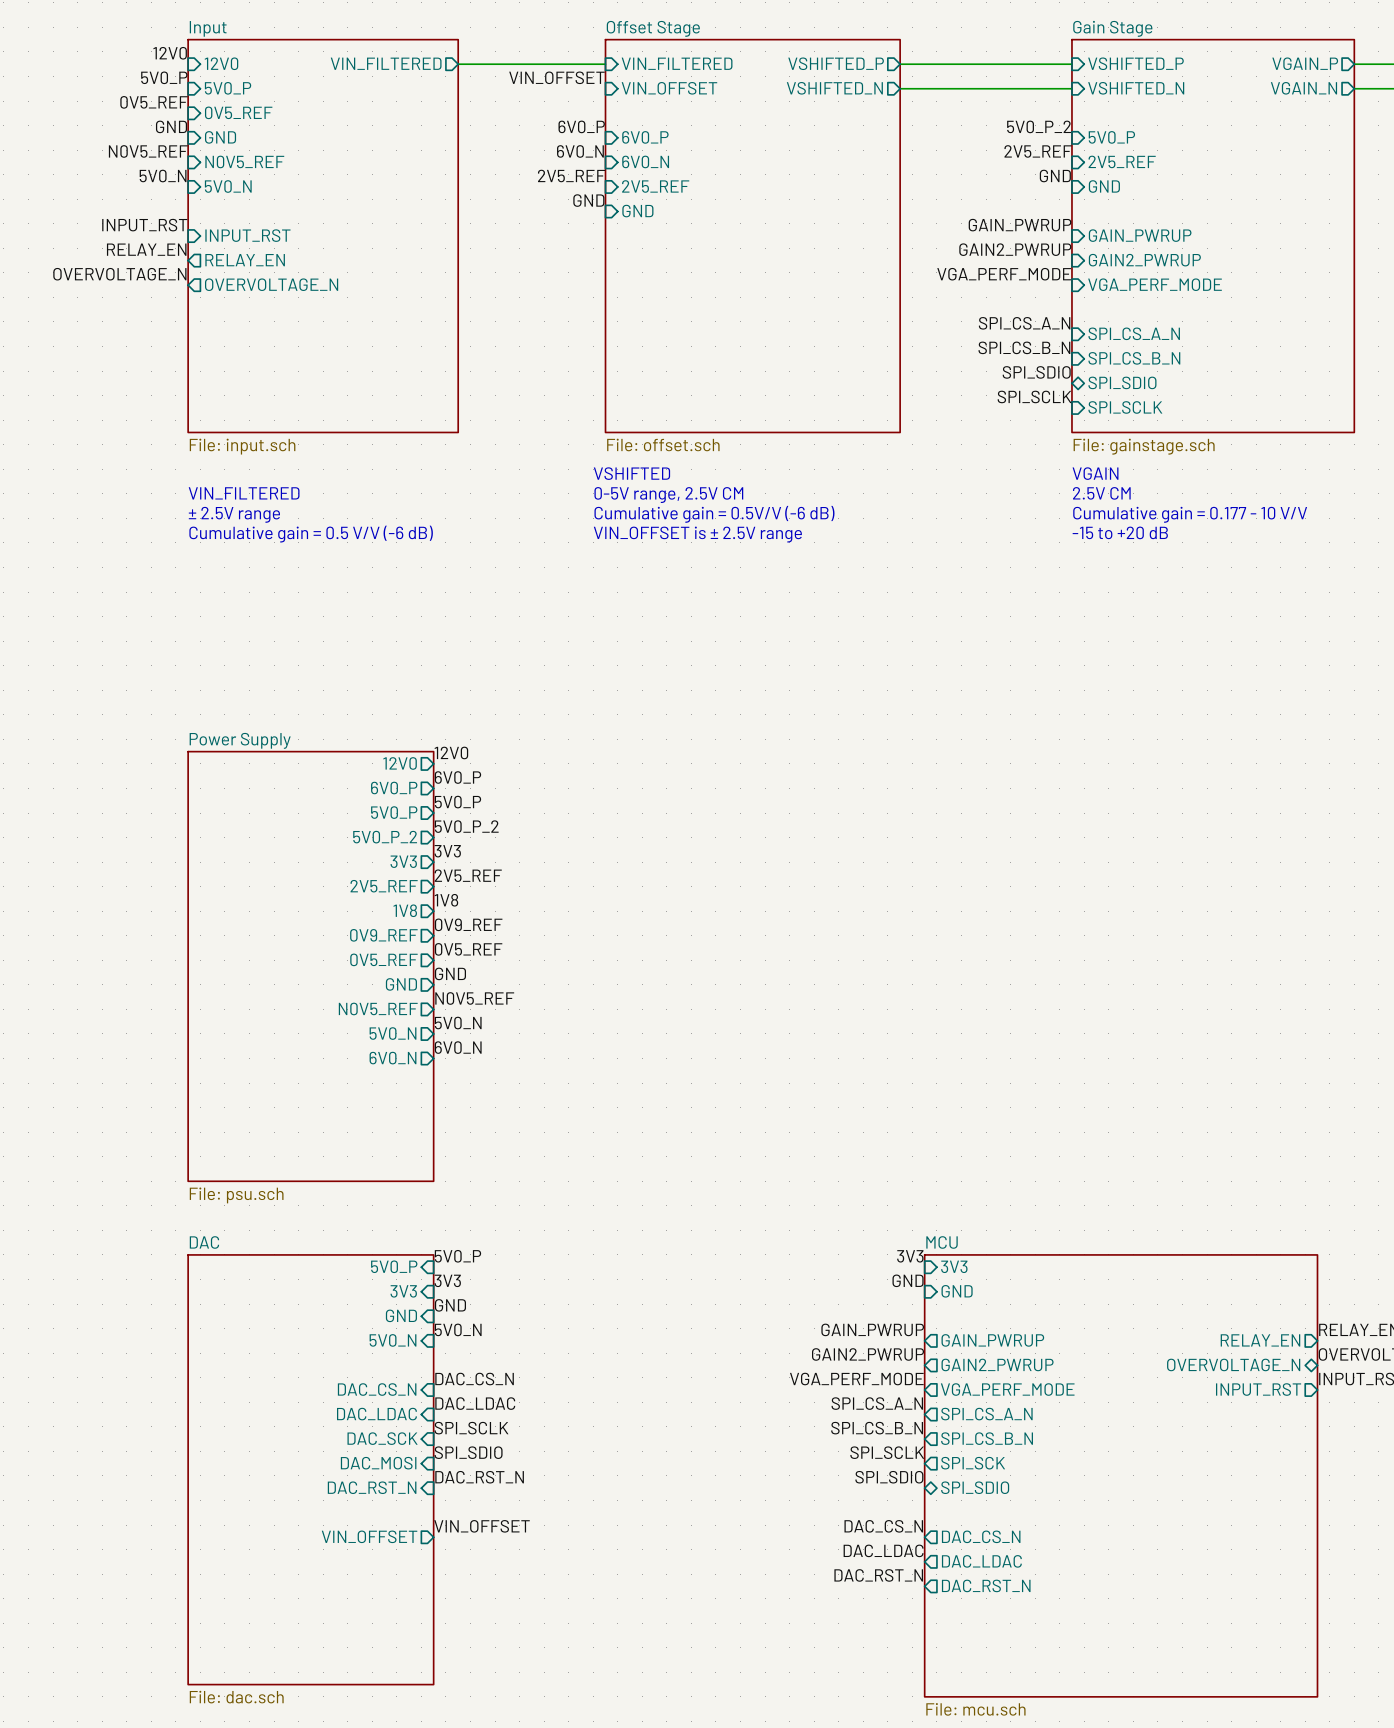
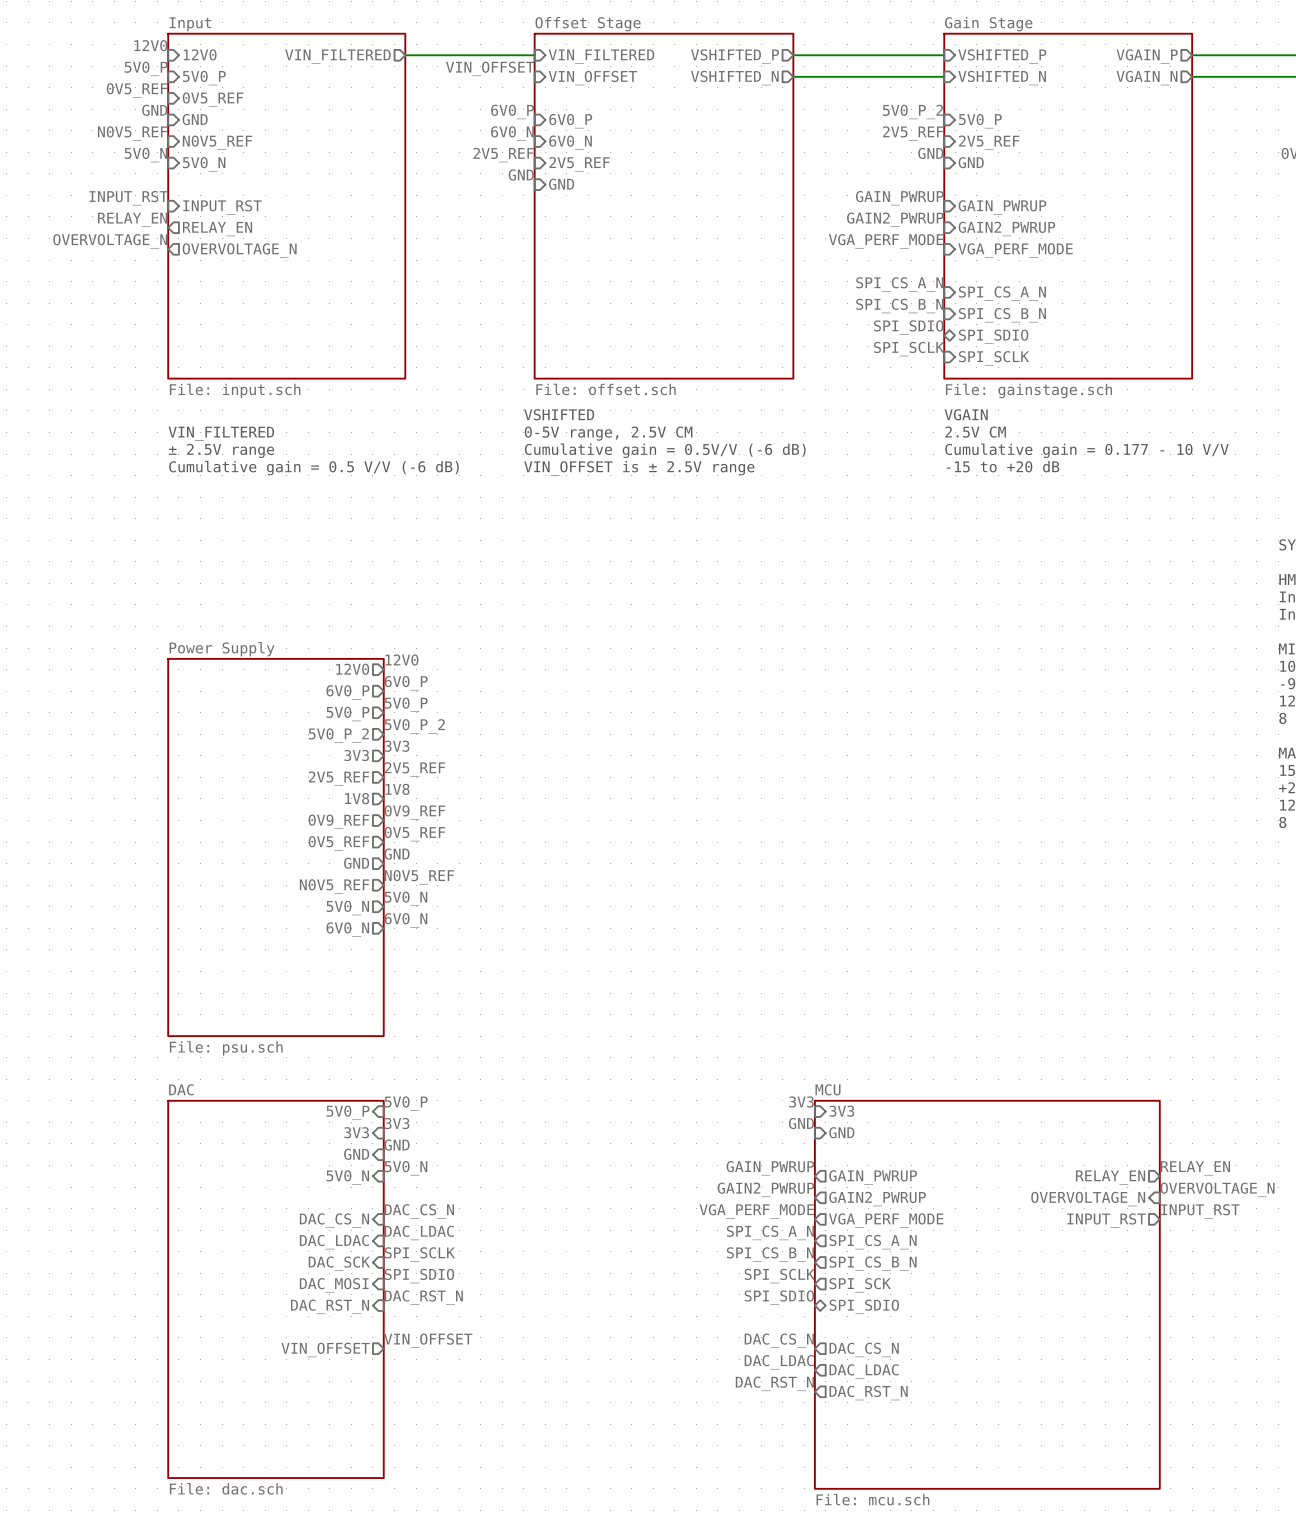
sheet pin shape: bidirectional (1233, 1364) -> input (1088, 1199)

